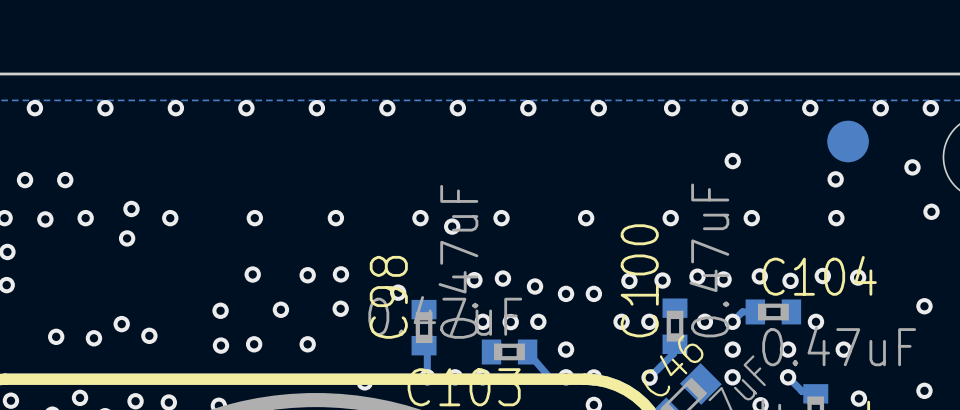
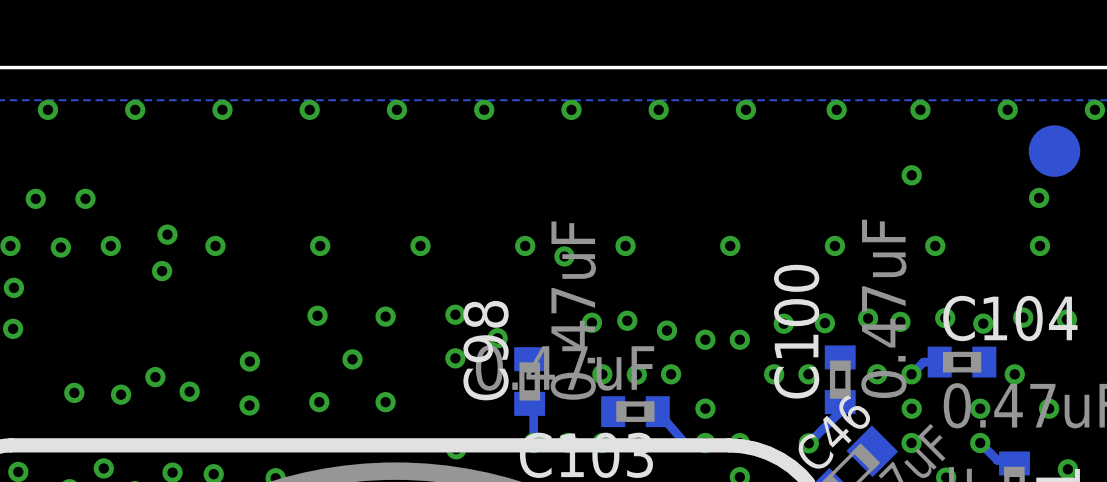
via: none -> (455, 314)
via: (340, 274) -> none
via: (340, 308) -> none
via: none -> (455, 358)
via: (220, 310) -> none
via: none -> (249, 361)
via: (221, 345) -> none
via: none -> (249, 405)

